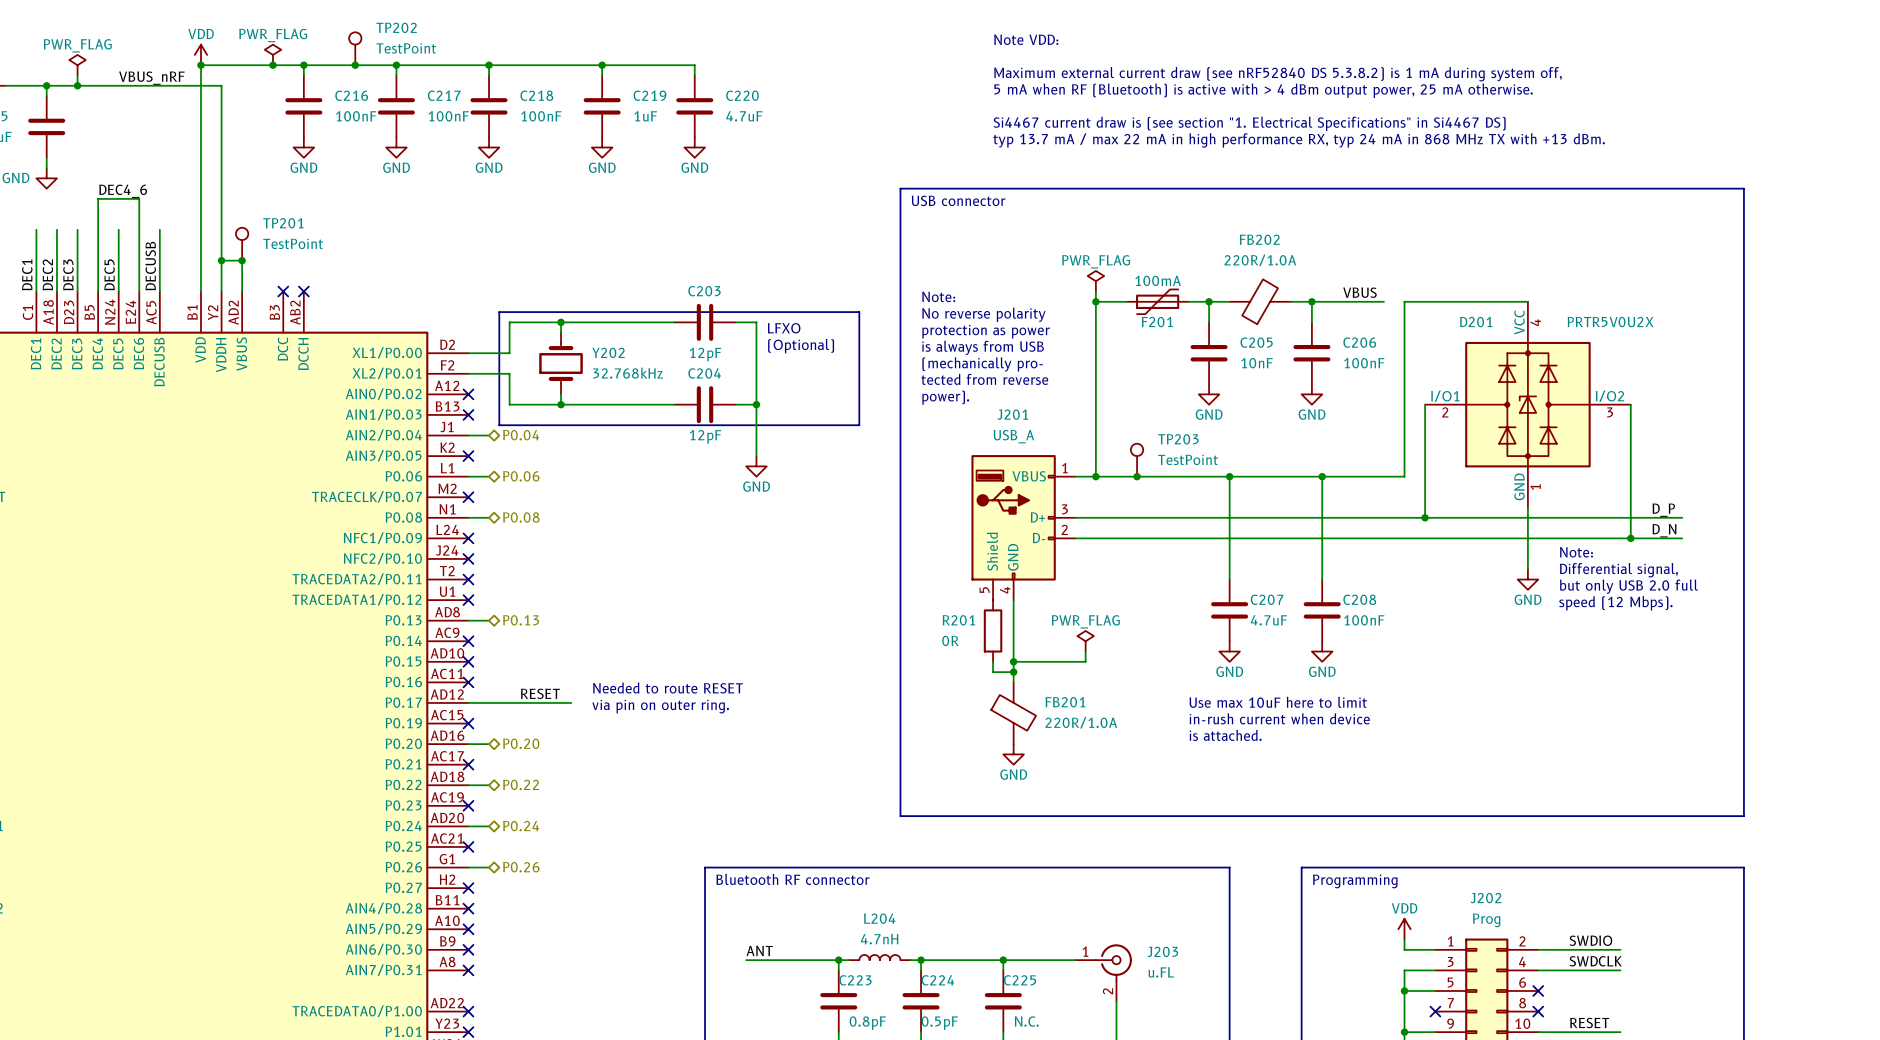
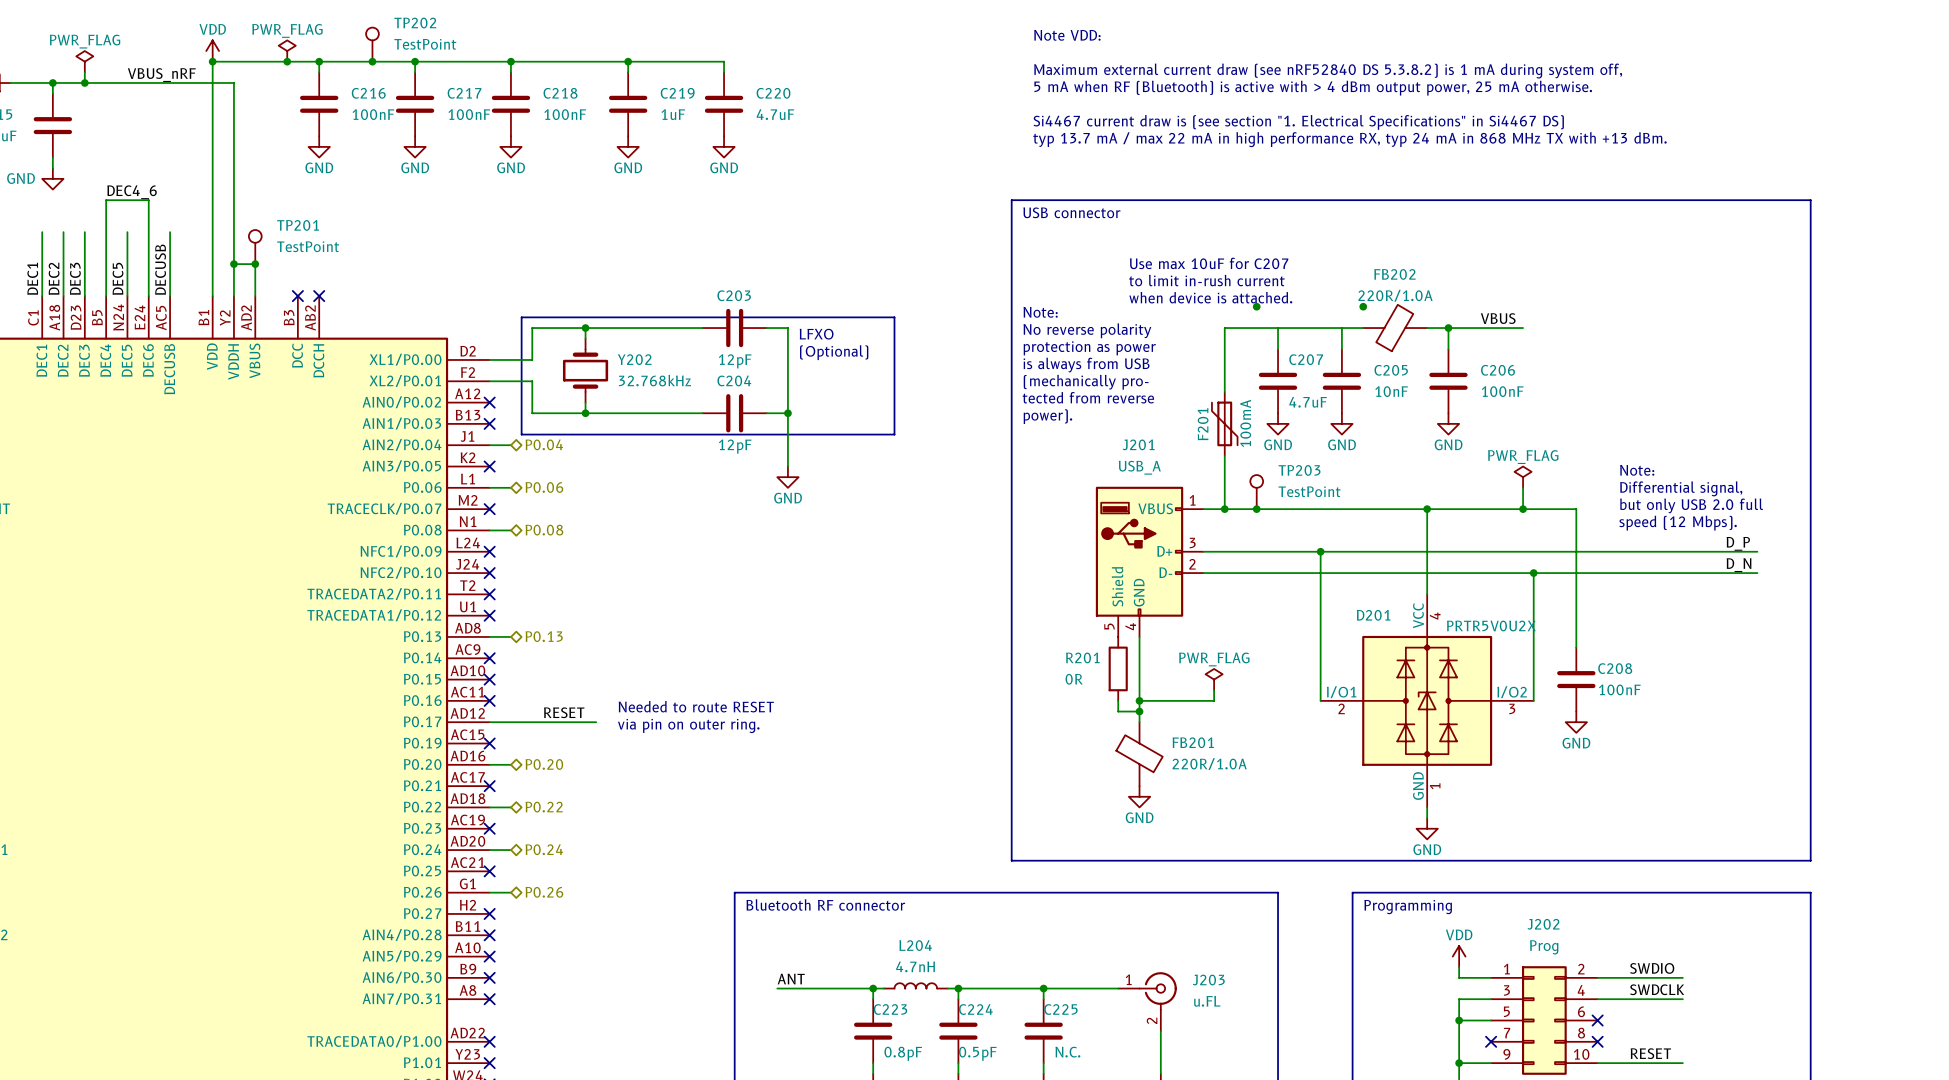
line: (1743, 198) (1743, 188) (900, 188) (900, 816) (1743, 816) -> (1810, 200) (1011, 200) (1011, 860) (1810, 860) (1810, 839)
text position: USB connector (958, 200) -> USB connector (1071, 212)
FB202 name position: FB202 (1259, 239) -> FB202 (1394, 274)
text: none -> Use max 10uF for C207 (1209, 263)
FB202 value position: 220R/1.0A (1260, 260) -> 220R/1.0A (1395, 295)
text: none -> to limit in-rush current (1206, 280)
power symbol: PWR_FLAG (1095, 281) -> none
wire: (1095, 291) (1095, 476) -> none
label position: VBUS (1359, 292) -> VBUS (1498, 318)
text: none -> when device is attached. (1210, 297)
text position: Note: (938, 296) -> Note: (1040, 312)
wire: (1095, 301) (1126, 301) -> none
junction: (1095, 301) -> none
F201 rotation: 0° (1157, 301) -> 90° clockwise (1224, 423)
F201 position: (1157, 301) -> (1224, 423)
wire: (1188, 301) (1229, 301) -> none
wire: (1209, 301) (1209, 322) -> (1341, 328) (1341, 349)
FB202 position: (1260, 301) -> (1395, 328)
wire: (1291, 301) (1383, 301) -> (1427, 328) (1523, 328)
wire: (1311, 301) (1311, 322) -> (1224, 391) (1224, 328) (1363, 328)
wire: (1527, 301) (1404, 301) (1404, 476) (1075, 476) -> none
text position: No reverse polarity (983, 314) -> No reverse polarity (1087, 330)
wire: none -> (1278, 328) (1278, 349)
wire: none -> (1448, 328) (1448, 349)
junction: none -> (1448, 328)
D201 value position: PRTR5V0U2X (1610, 322) -> PRTR5V0U2X (1491, 625)
text position: protection as power (986, 331) -> protection as power (1089, 348)
text position: is always from USB (983, 347) -> is always from USB (1086, 365)
C205 position: (1209, 353) -> (1341, 381)
C206 position: (1311, 353) -> (1448, 381)
text position: (mechanically pro- (982, 364) -> (mechanically pro- (1086, 382)
text position: tected from reverse (984, 379) -> tected from reverse (1088, 397)
power symbol position: GND (1209, 394) -> GND (1278, 423)
power symbol position: GND (1311, 394) -> GND (1341, 423)
text position: power). (945, 397) -> power). (1047, 416)
wire: (1425, 404) (1425, 517) -> none
D201 position: (1527, 404) -> (1427, 700)
wire: (1630, 404) (1630, 538) -> none
power symbol: none -> GND (1448, 423)
wire: none -> (1224, 455) (1224, 509)
TP203 position: (1137, 460) -> (1256, 492)
power symbol: none -> PWR_FLAG (1523, 477)
junction: (1095, 476) -> none
junction: (1137, 476) -> none
wire: (1229, 476) (1229, 579) -> none
junction: (1229, 476) -> none
wire: (1322, 476) (1322, 579) -> none
junction: (1322, 476) -> none
wire: none -> (1523, 487) (1523, 509)
wire: none -> (1203, 509) (1576, 509) (1576, 647)
junction: none -> (1224, 509)
junction: none -> (1256, 509)
wire: none -> (1427, 509) (1427, 594)
junction: none -> (1427, 509)
junction: none -> (1523, 509)
wire: (1527, 507) (1527, 569) -> none
label position: D_P (1663, 510) -> D_P (1738, 543)
wire: (1075, 517) (1682, 517) -> none
junction: (1425, 517) -> none
J201 position: (1023, 527) -> (1149, 561)
label position: D_N (1664, 530) -> D_N (1739, 565)
wire: none -> (1320, 551) (1320, 700)
junction: none -> (1320, 551)
junction: (1630, 538) -> none
wire: none -> (1746, 551) (1757, 551)
text position: Note: (1576, 552) -> Note: (1637, 470)
wire: none -> (1203, 573) (1757, 573)
wire: none -> (1533, 573) (1533, 700)
junction: none -> (1533, 573)
text position: Differential signal, (1618, 570) -> Differential signal, (1681, 488)
power symbol: GND (1527, 579) -> none
text position: but only USB 2.0 full (1629, 586) -> but only USB 2.0 full (1691, 505)
C207 name position: C207 (1267, 599) -> C207 (1306, 359)
wire: (1013, 600) (1013, 682) -> (1139, 636) (1139, 722)
text position: speed (12 Mbps). (1615, 603) -> speed (12 Mbps). (1678, 523)
C207 position: (1229, 610) -> (1278, 381)
C208 position: (1322, 610) -> (1576, 679)
C207 value position: 4.7uF (1268, 620) -> 4.7uF (1308, 402)
R201 position: (993, 630) -> (1118, 668)
power symbol position: PWR_FLAG (1085, 641) -> PWR_FLAG (1214, 679)
wire: (1085, 651) (1085, 661) (1013, 661) -> (1214, 690) (1214, 700) (1139, 700)
power symbol: GND (1229, 651) -> none
power symbol: GND (1322, 651) -> none
wire: (993, 661) (993, 672) (1013, 672) -> (1118, 700) (1118, 711) (1139, 711)
junction: (1013, 661) -> none
junction: (1013, 672) -> none
junction: none -> (1139, 700)
junction: none -> (1139, 711)
text: Use max 10uF here to limit (1278, 702) -> none
power symbol: none -> GND (1576, 722)
FB201 position: (1013, 713) -> (1139, 754)
text: in-rush current when device (1279, 718) -> none
text: is attached. (1225, 735) -> none
power symbol position: GND (1013, 754) -> GND (1139, 796)
wire: none -> (1427, 807) (1427, 818)
power symbol: none -> GND (1427, 828)

